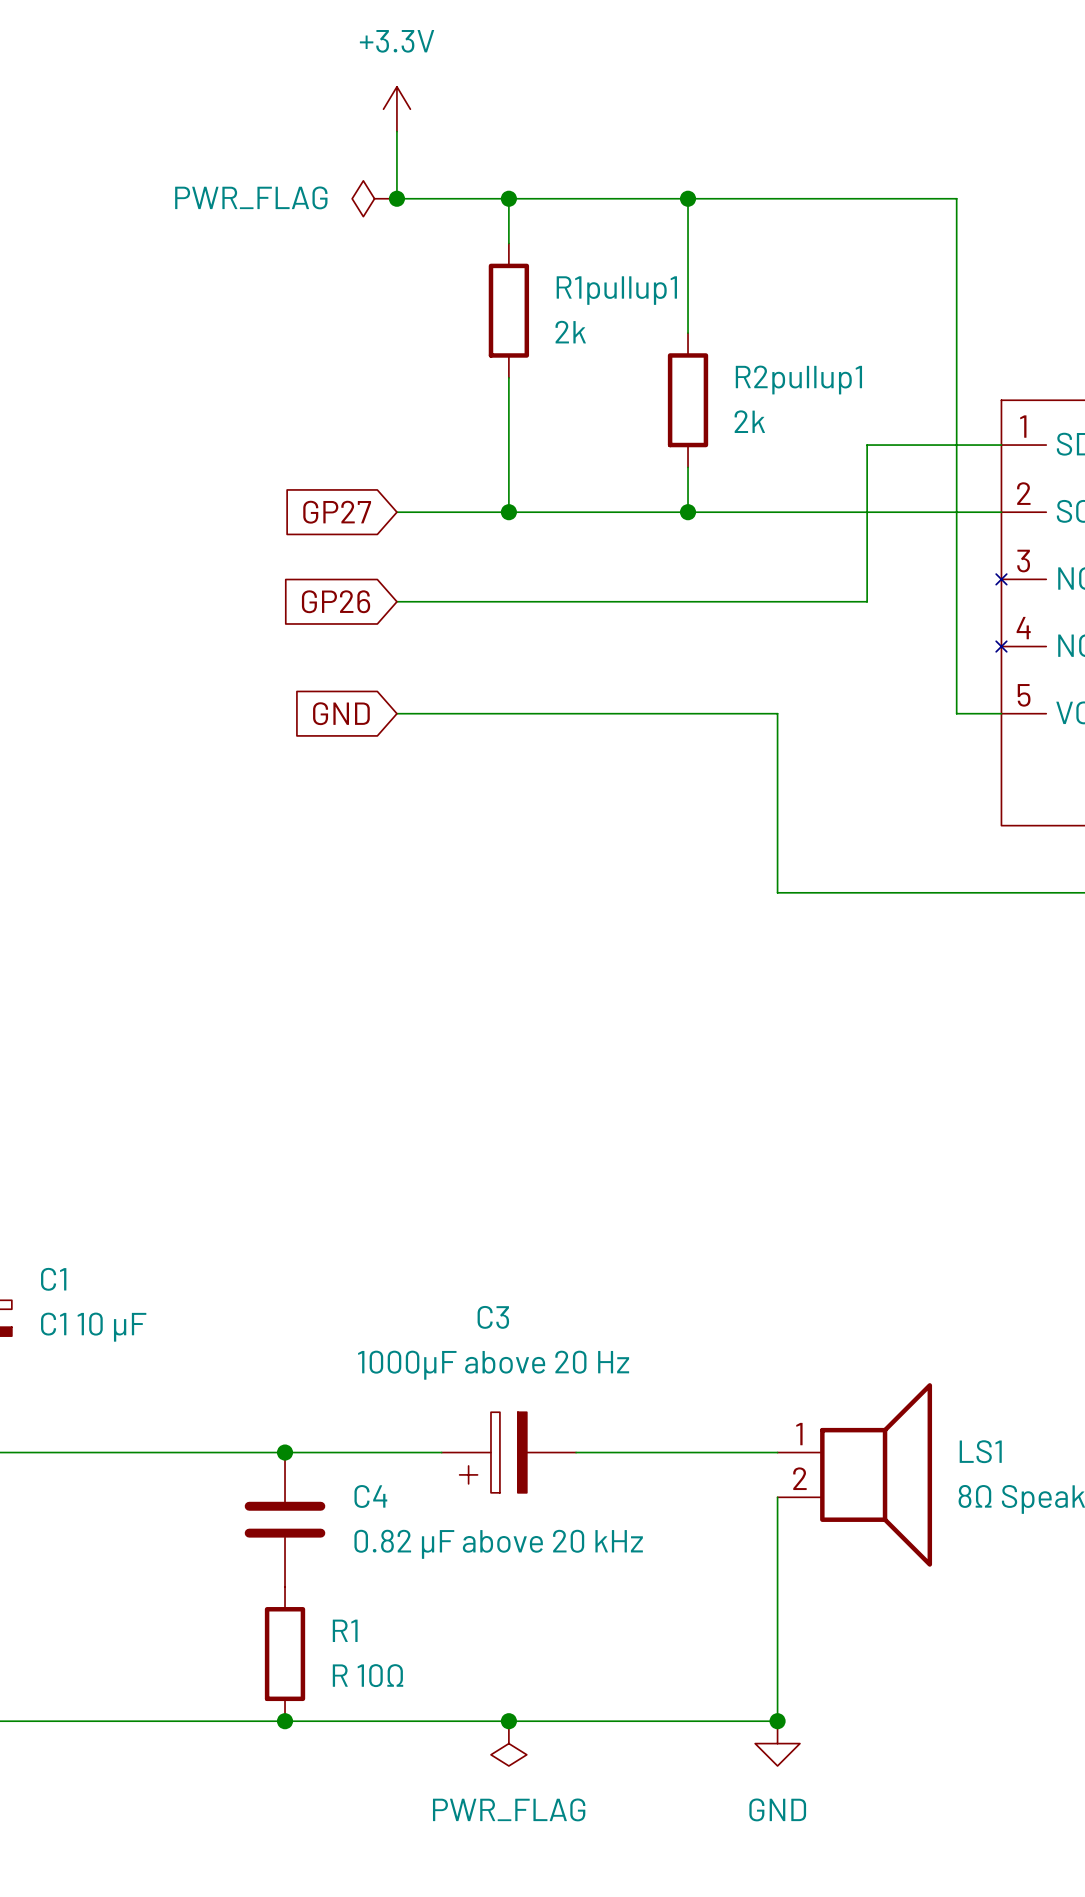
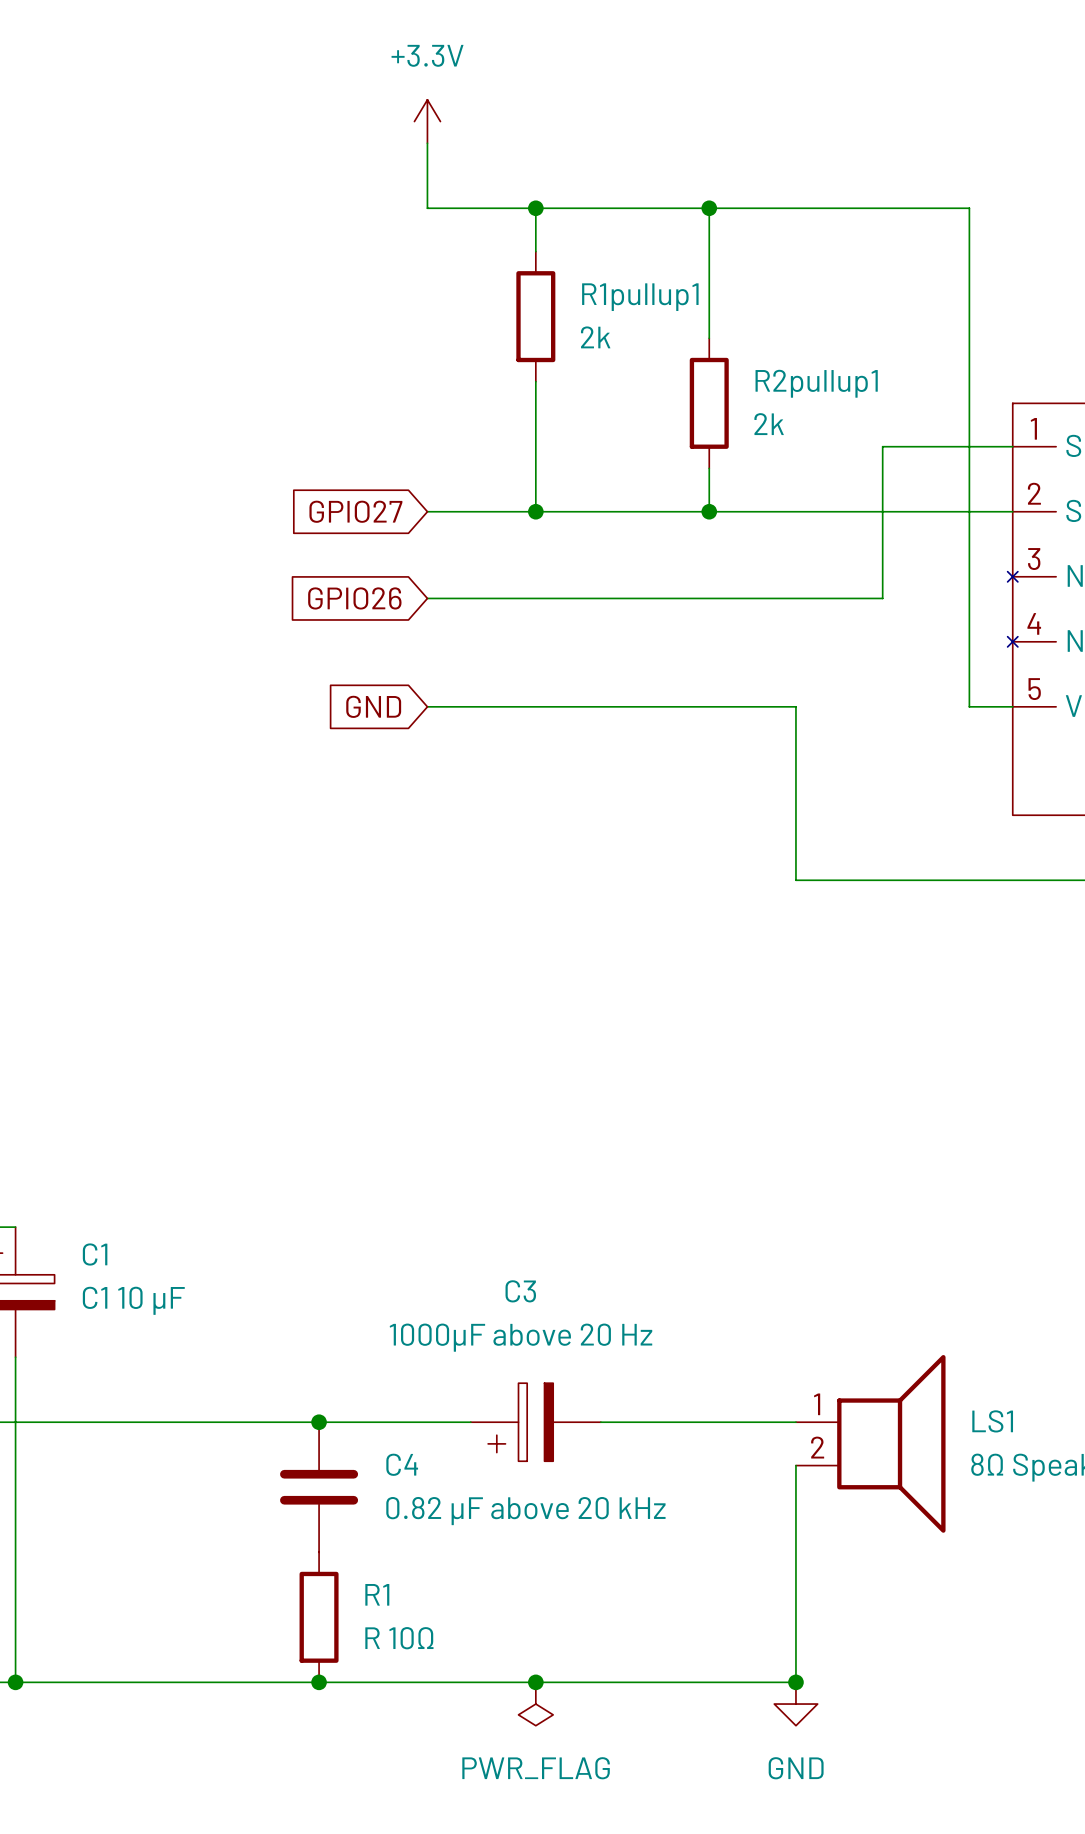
power symbol: PWR_FLAG (374, 198) -> none
junction: (396, 198) -> none
global label: GP27 (337, 512) -> GPIO27 (355, 511)
global label: GP26 (336, 601) -> GPIO26 (354, 598)

